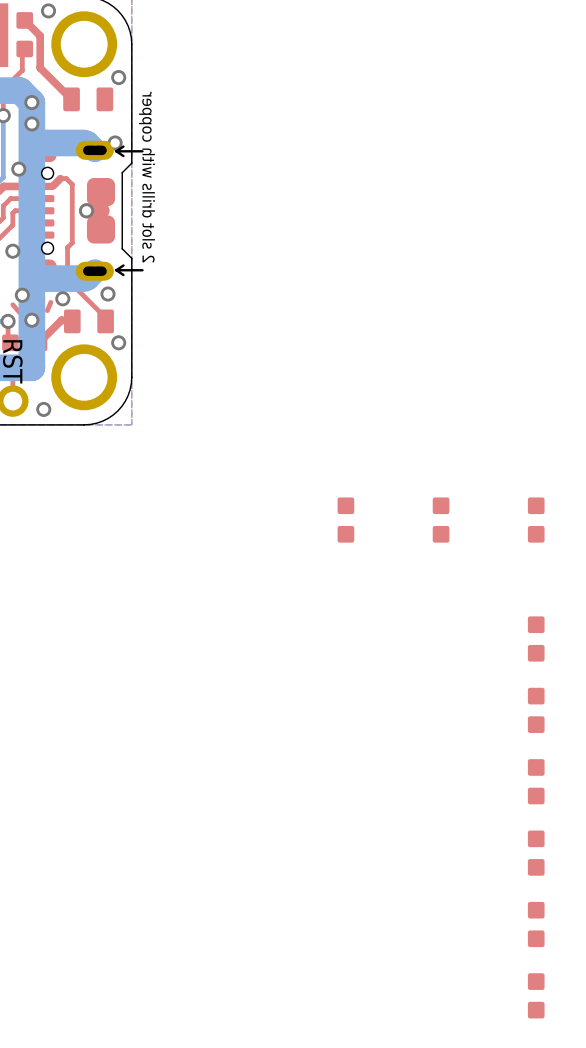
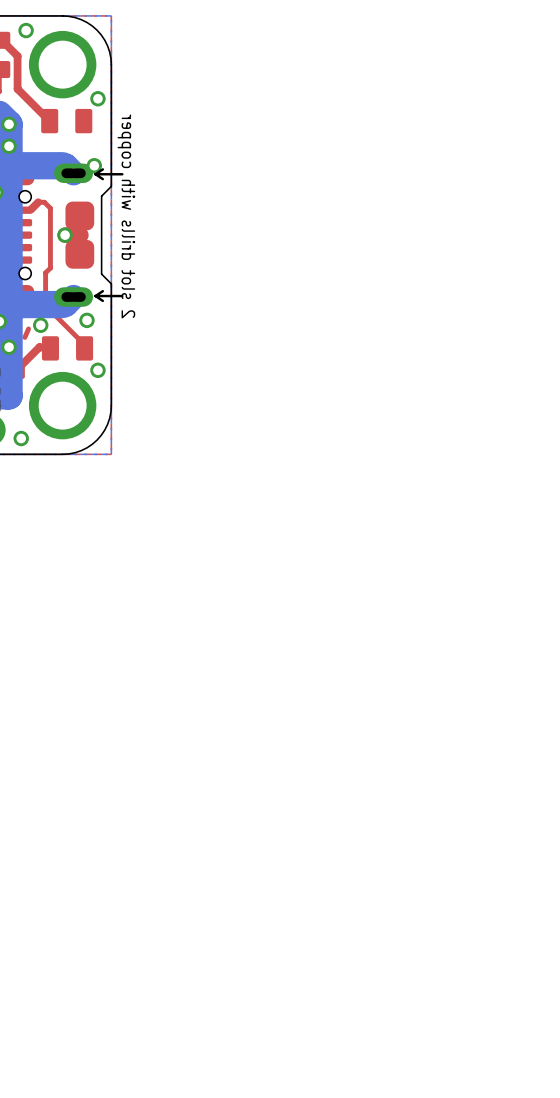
part: (345, 520) -> none
part: (441, 520) -> none
part: (536, 520) -> none
part: (536, 639) -> none
part: (536, 710) -> none
part: (536, 781) -> none
part: (536, 853) -> none
part: (536, 924) -> none
part: (536, 995) -> none

